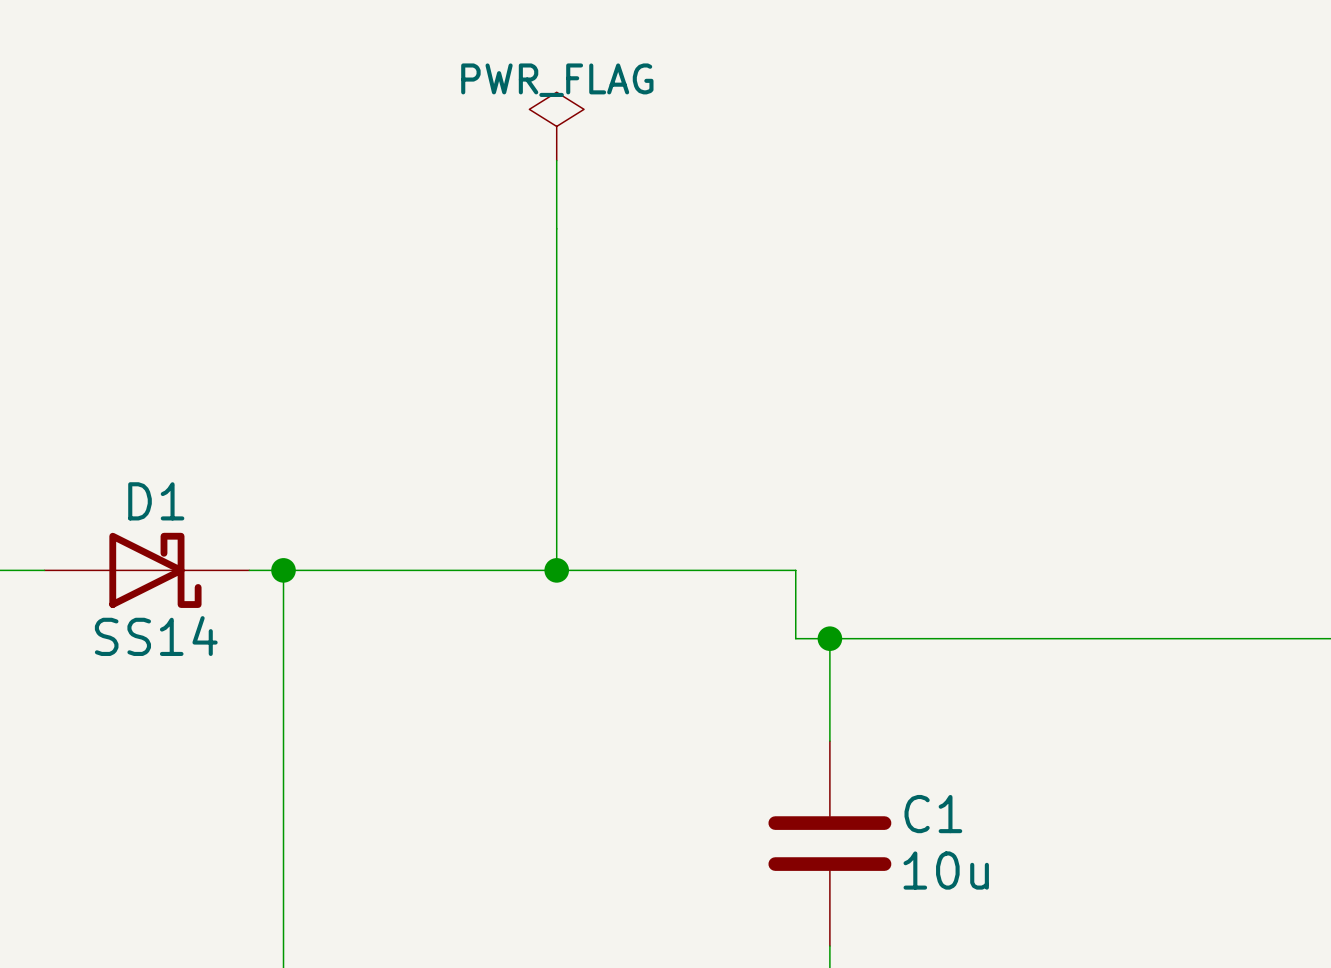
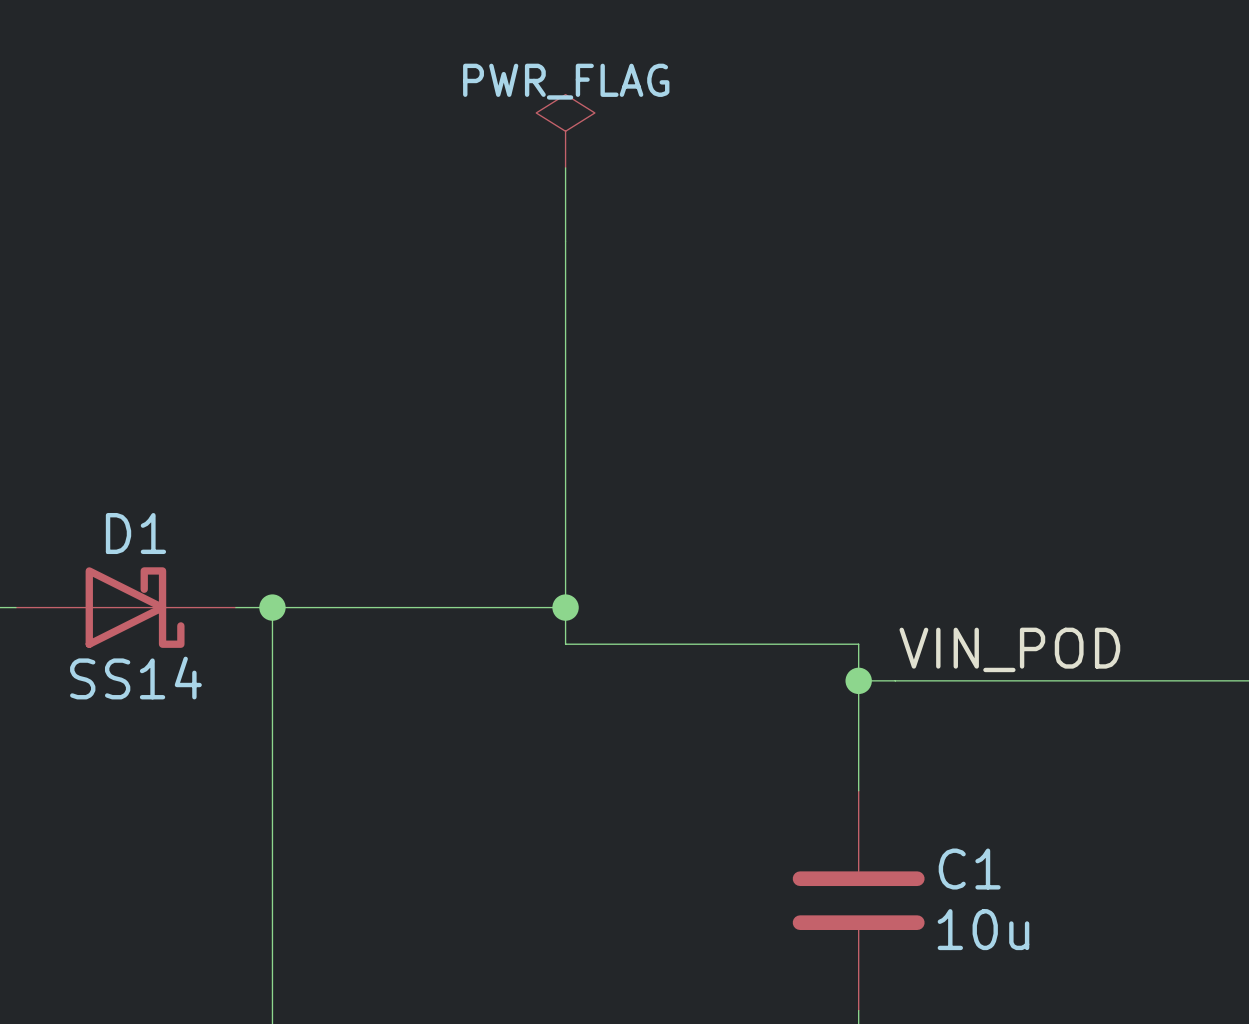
wire: (556, 570) (795, 570) (795, 638) (829, 638) -> (565, 607) (565, 644) (858, 644) (858, 680)
label: none -> VIN_POD (1009, 649)

